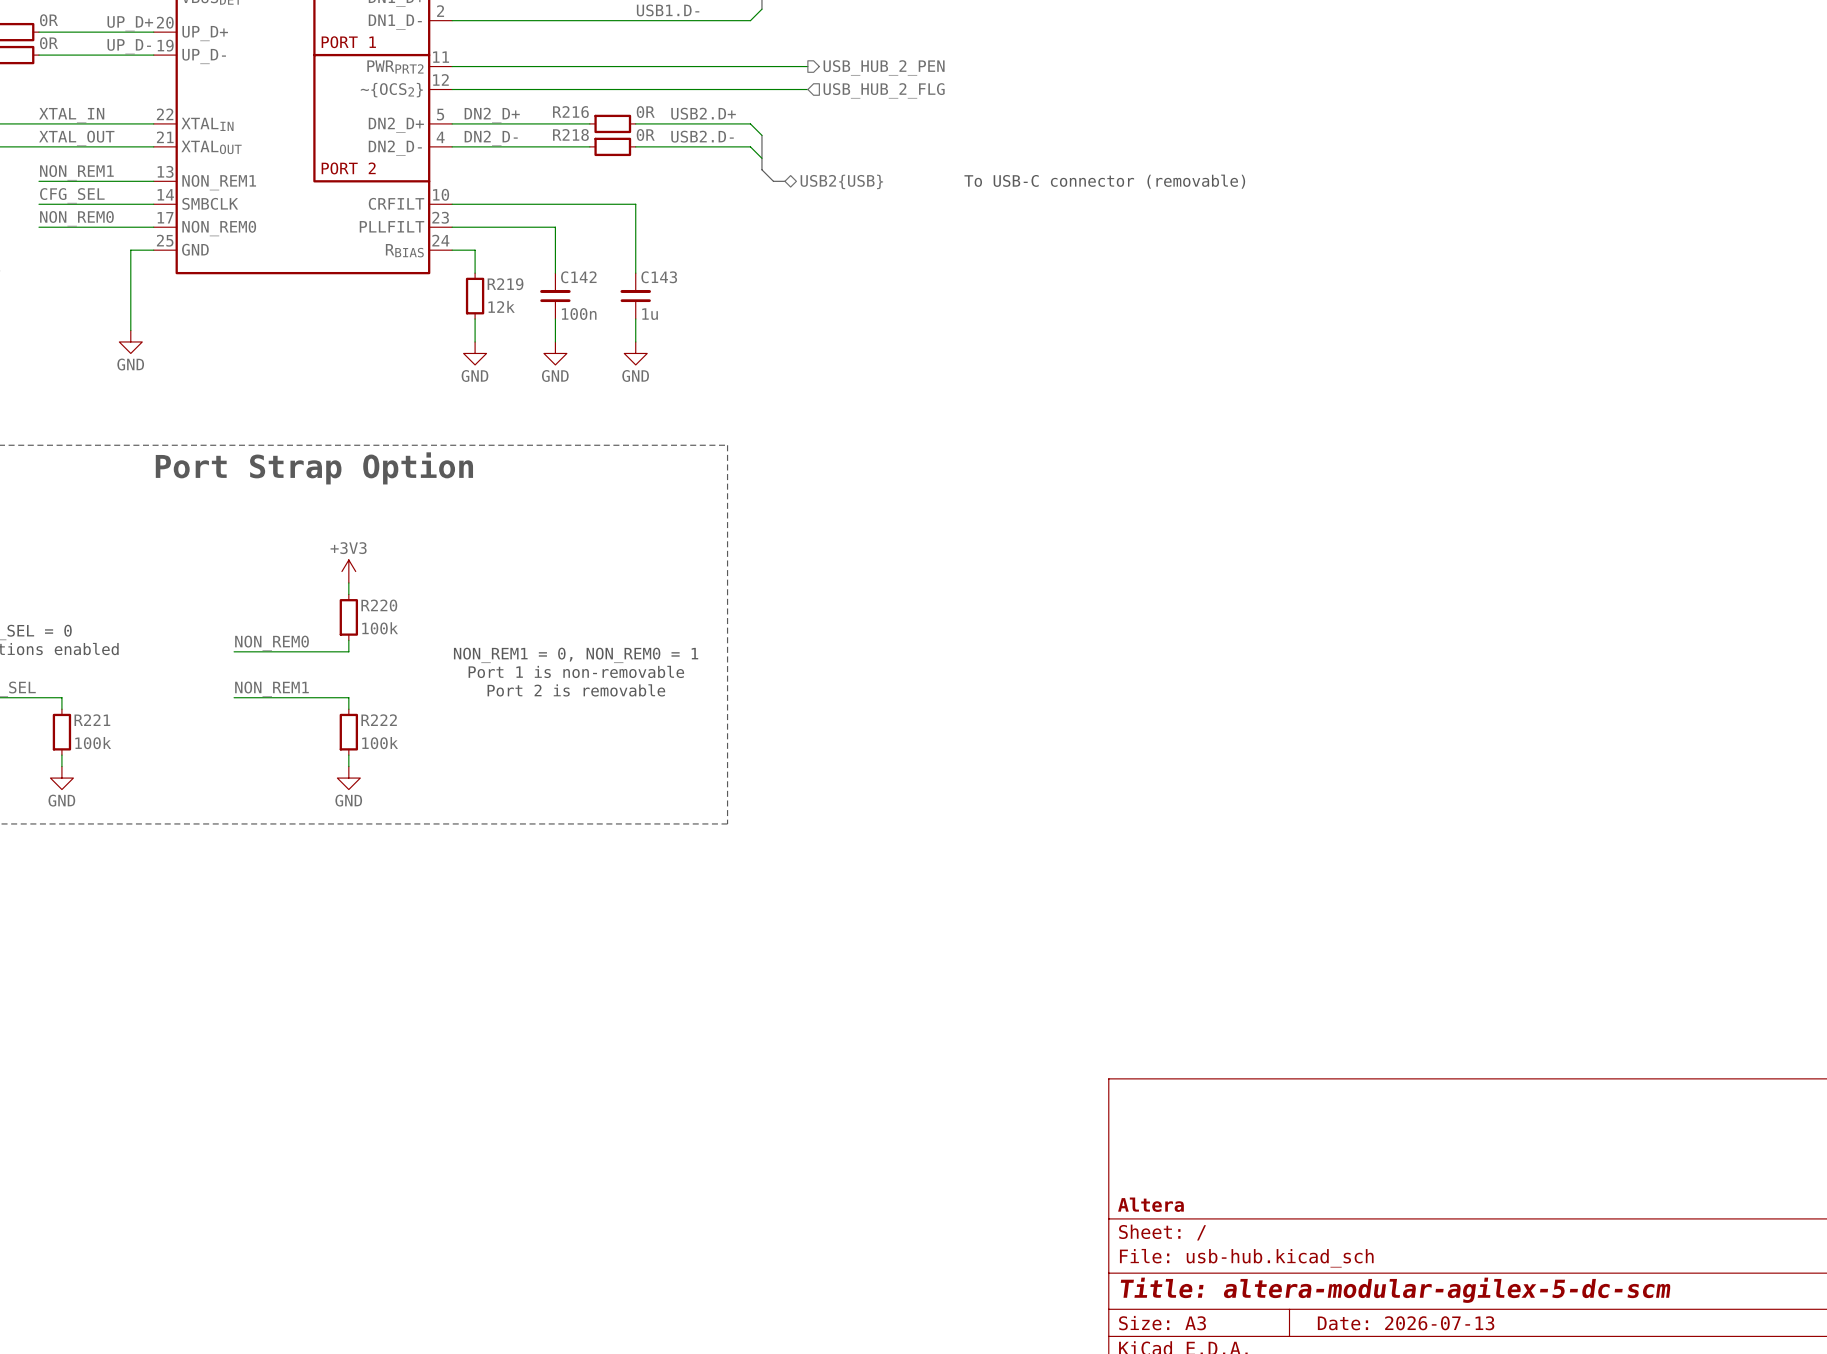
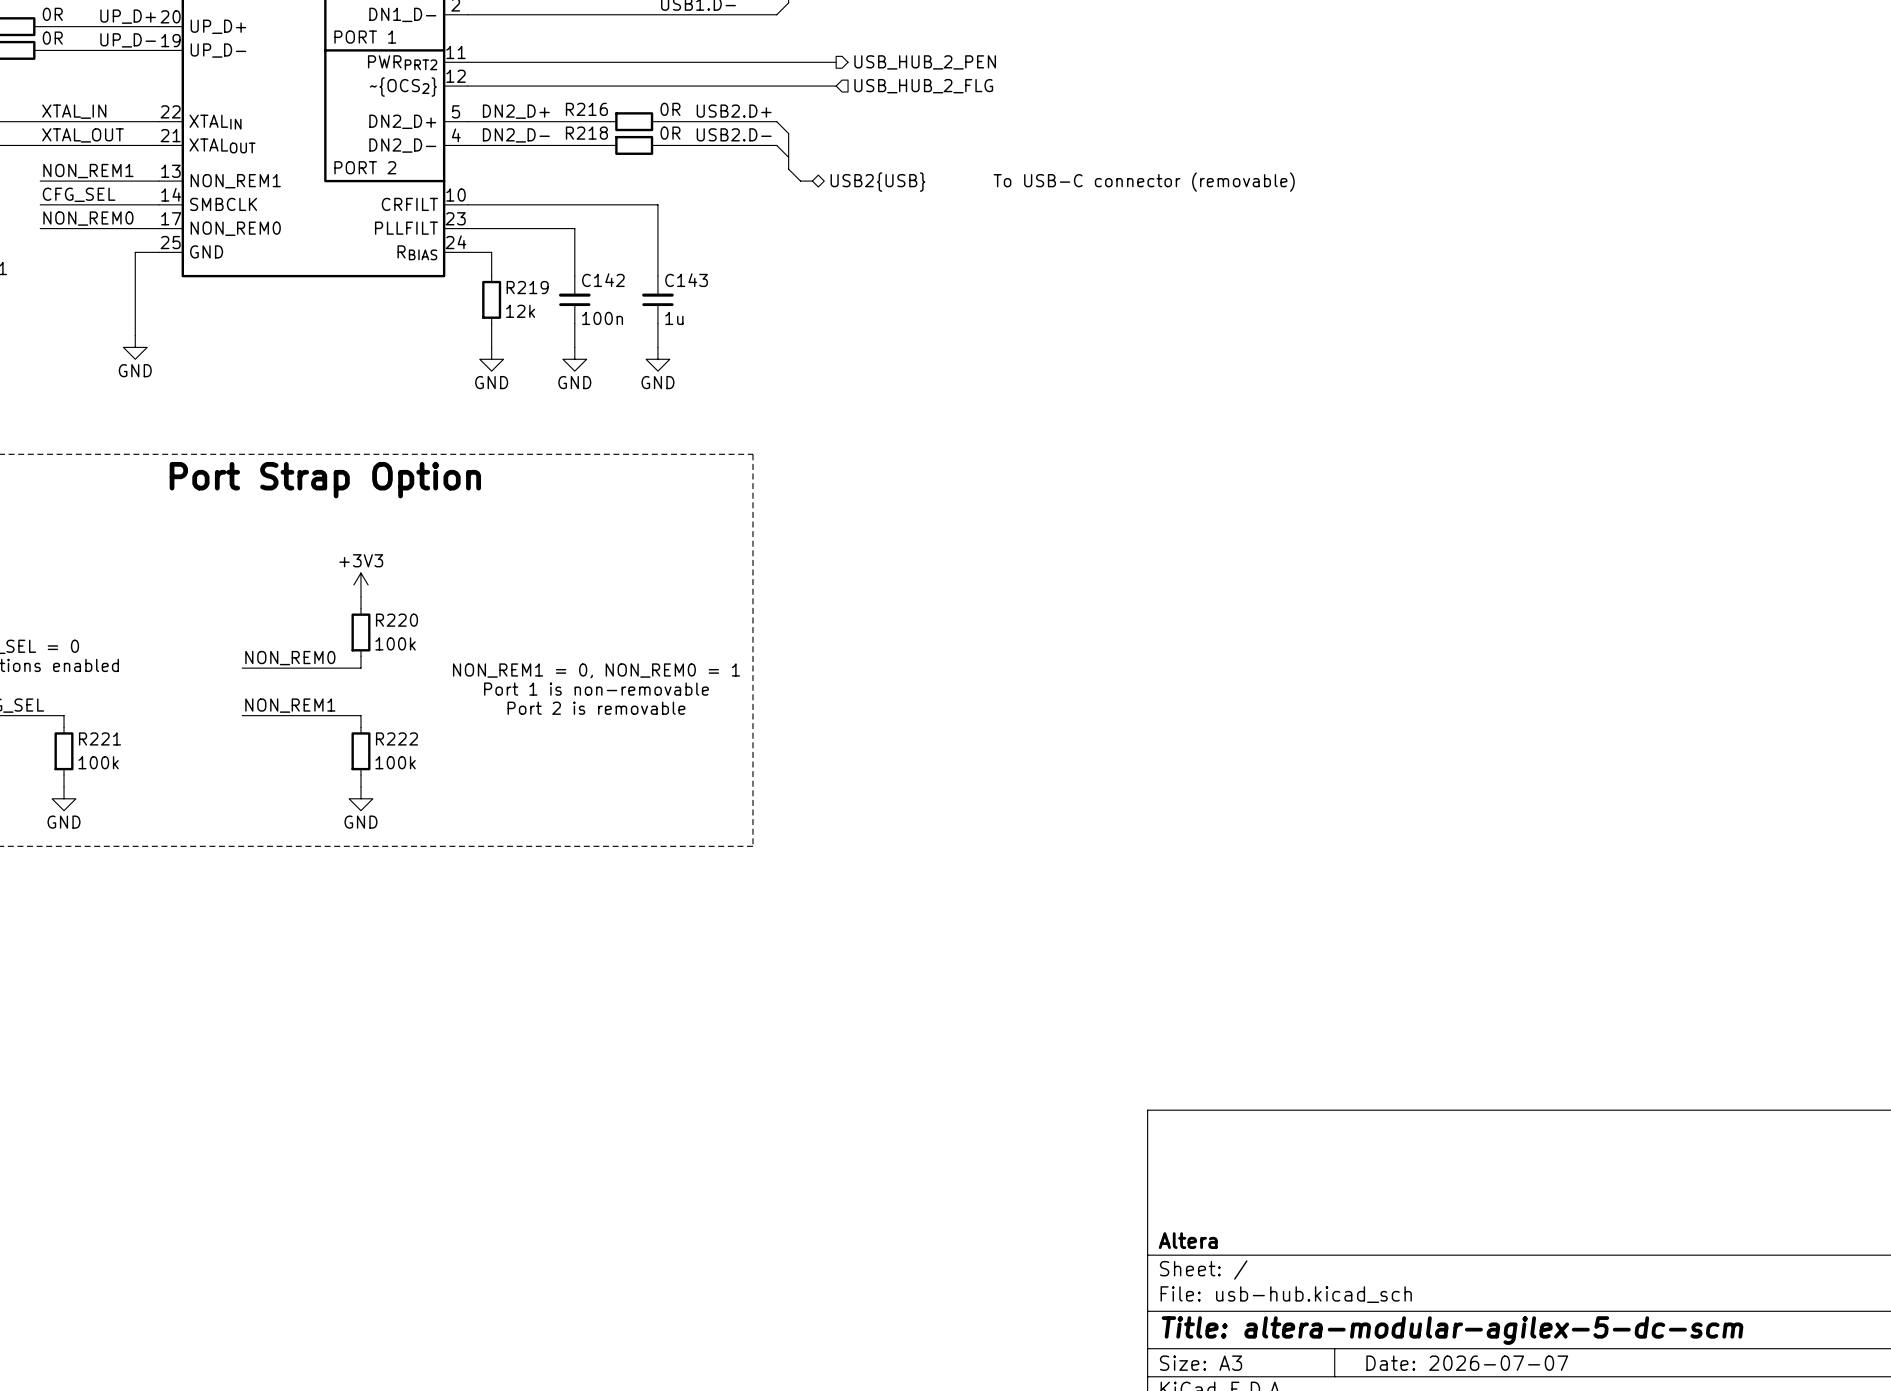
title block: Date: 2026-07-13 (1406, 1323) -> Date: 2026-07-07 (1467, 1363)

